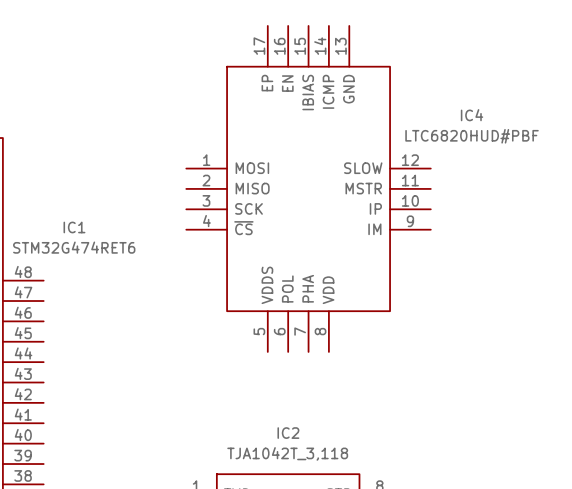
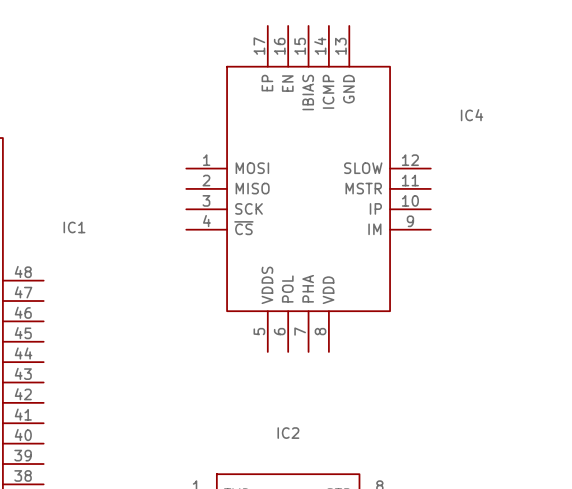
IC4 value: LTC6820HUD#PBF (472, 136) -> none
IC1 value: STM32G474RET6 (74, 247) -> none
IC2 value: TJA1042T_3,118 (287, 453) -> none

